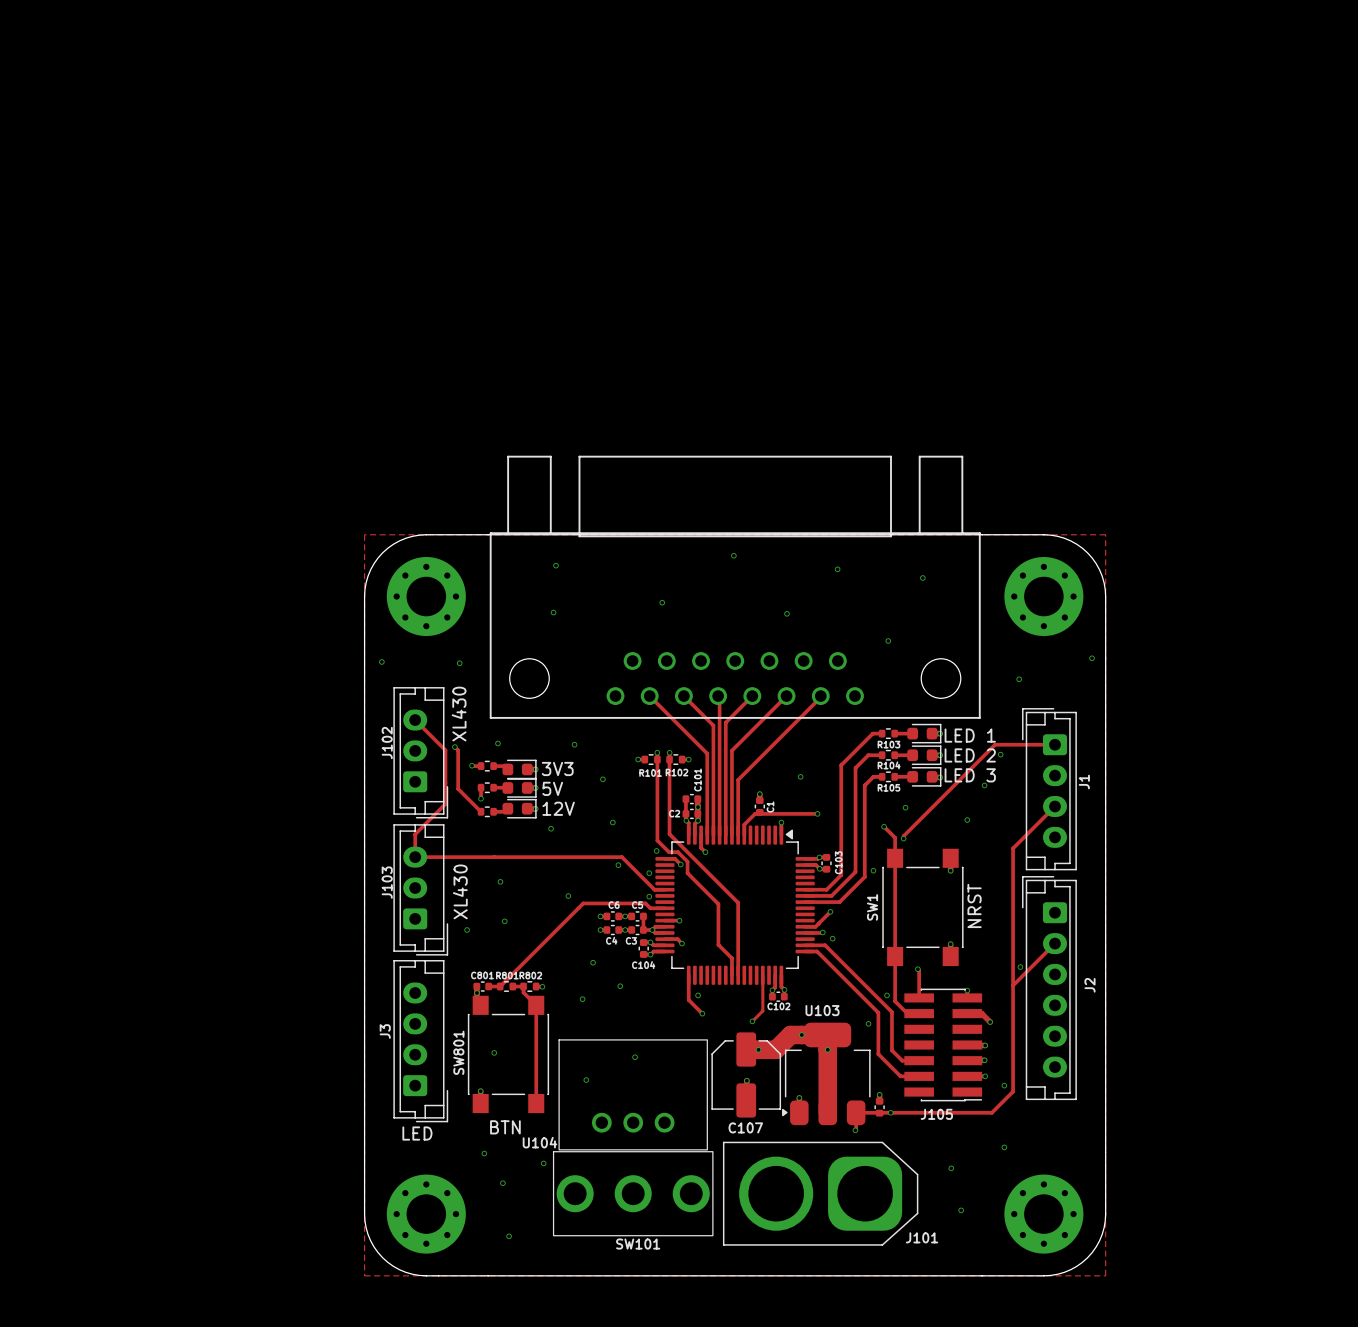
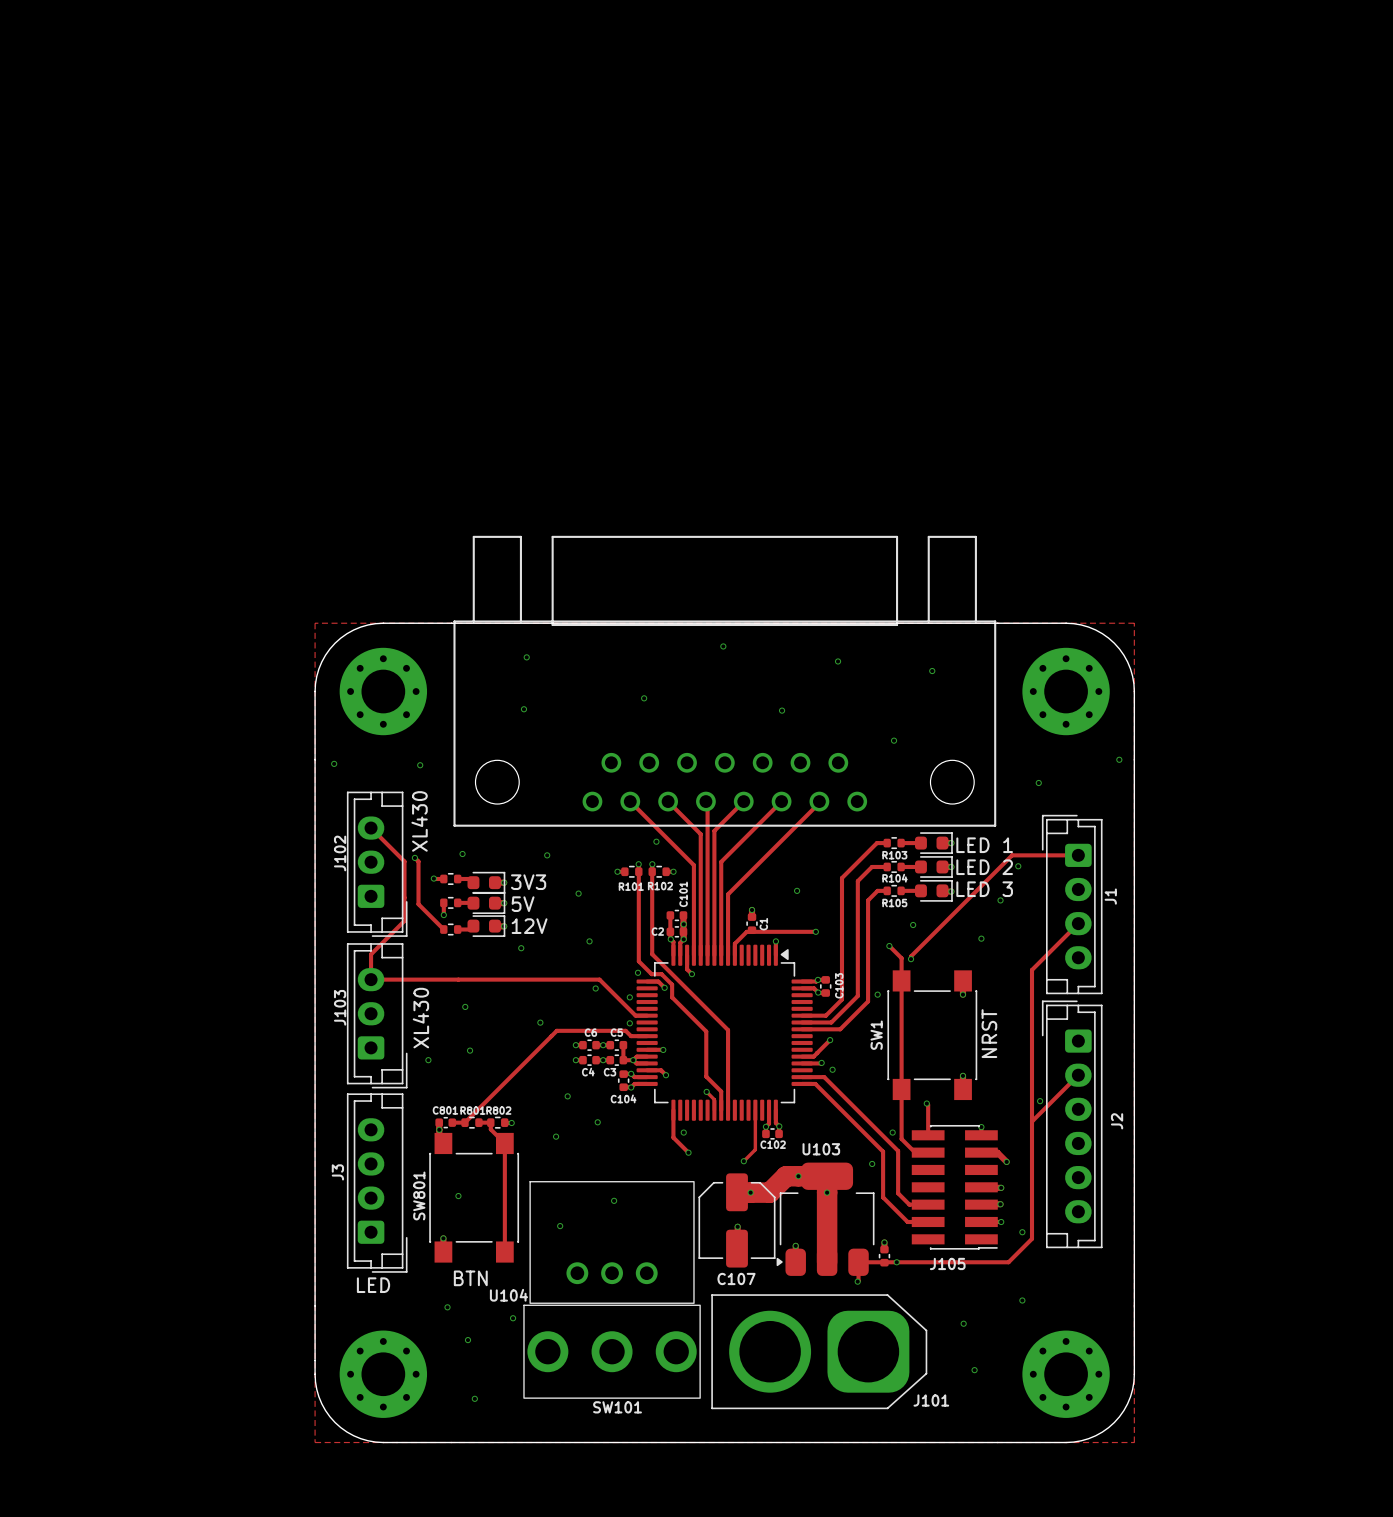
via: none -> (656, 841)
track: none -> (706, 1091) (714, 1099) (714, 1110)
via: none -> (706, 1091)

